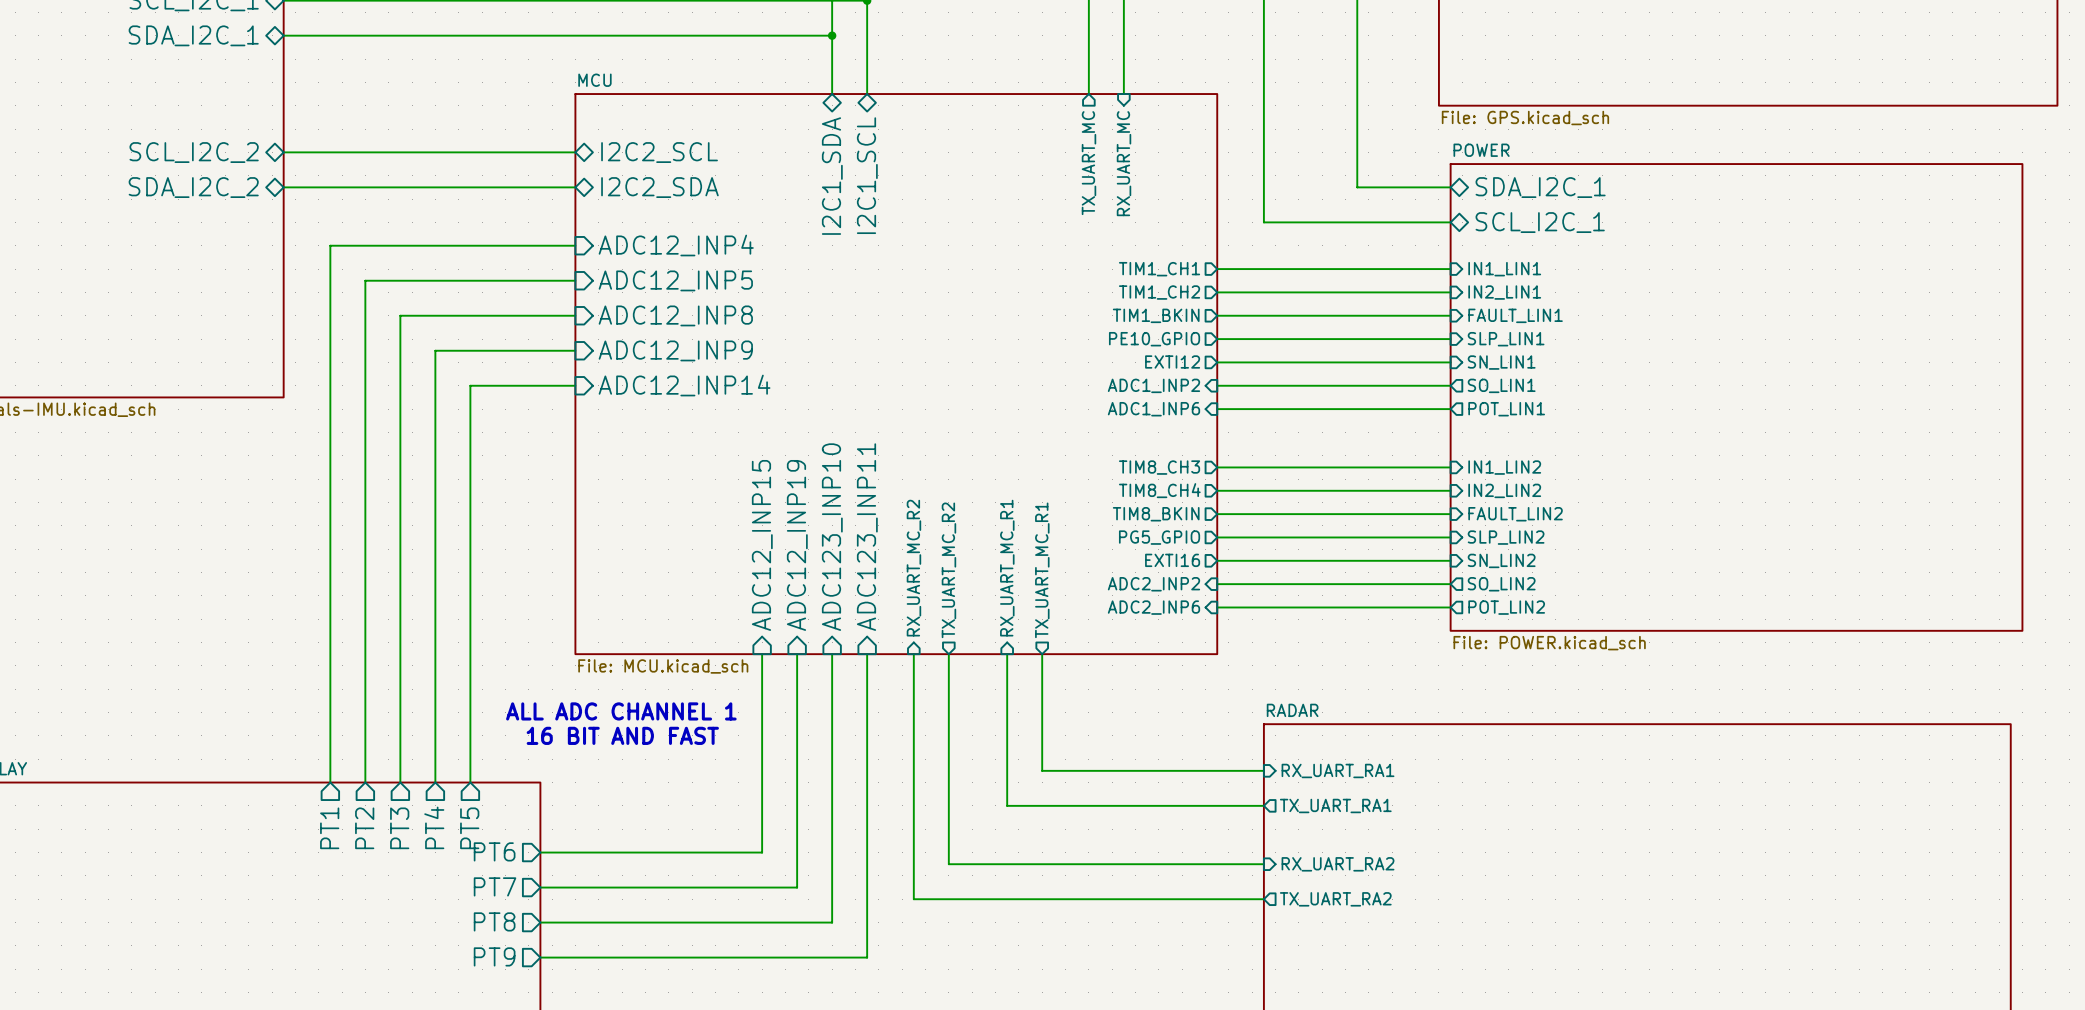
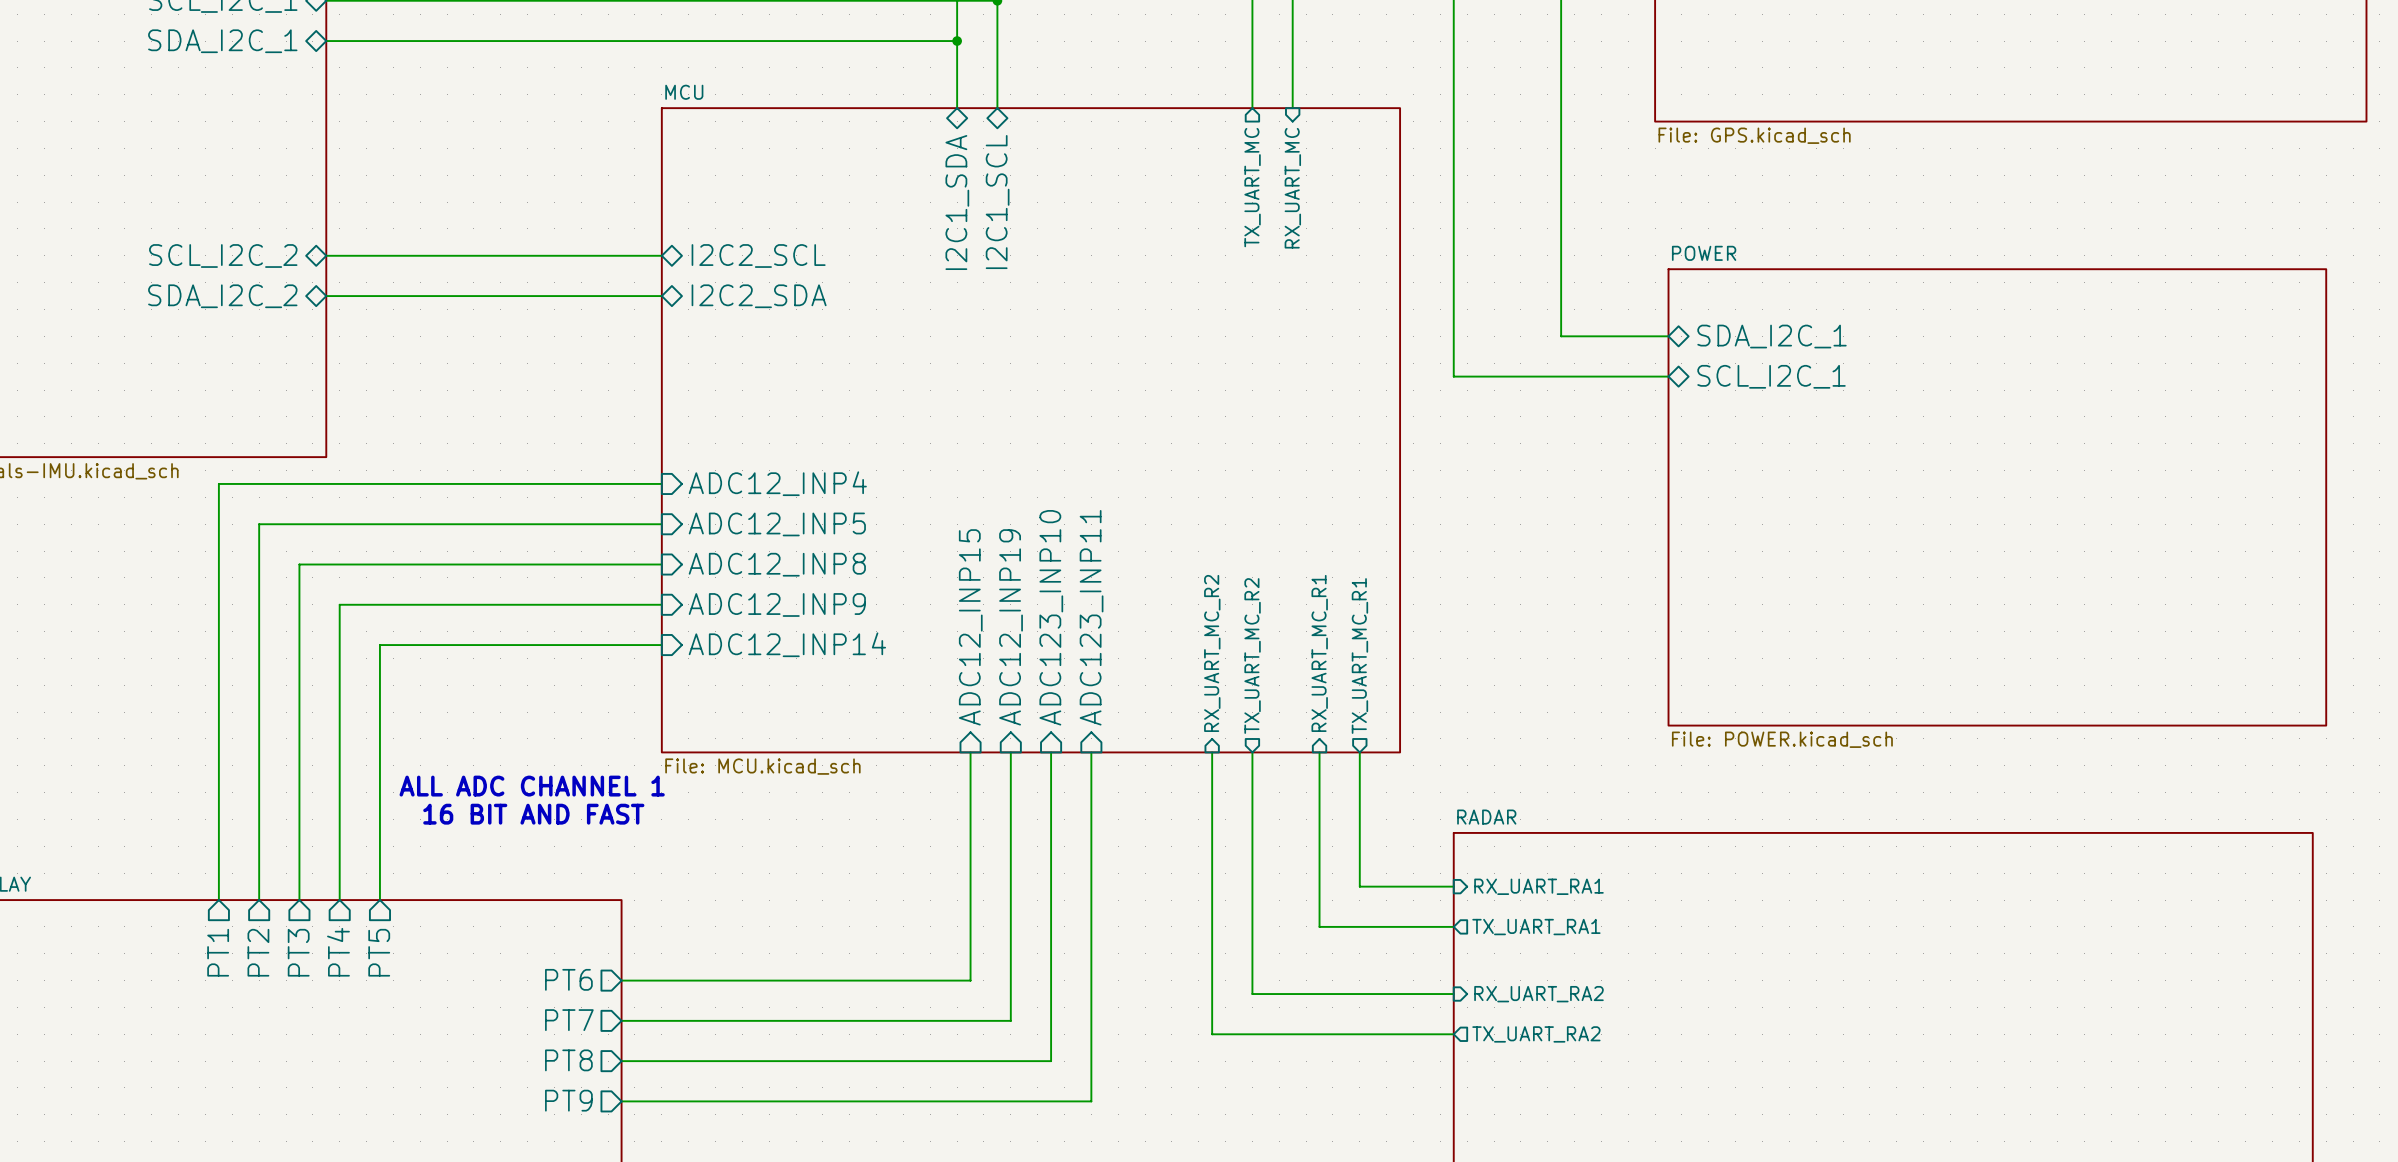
sheet pin position: SCL_I2C_2 (194, 152) -> SCL_I2C_2 (223, 256)
wire: (283, 152) (575, 152) -> (326, 255) (661, 255)
sheet pin position: I2C2_SCL (659, 152) -> I2C2_SCL (758, 256)
sheet pin position: SDA_I2C_2 (193, 187) -> SDA_I2C_2 (222, 296)
wire: (283, 187) (575, 187) -> (326, 296) (661, 296)
sheet pin position: I2C2_SDA (659, 187) -> I2C2_SDA (759, 296)
wire: (1357, 187) (1450, 187) -> (1561, 215) (1561, 336)
sheet pin position: SDA_I2C_1 (1540, 187) -> SDA_I2C_1 (1772, 336)
wire: (1263, 222) (1450, 222) -> (1453, 255) (1453, 376) (1668, 376)
sheet pin position: SCL_I2C_1 (1540, 222) -> SCL_I2C_1 (1771, 376)
wire: (575, 245) (330, 245) (330, 560) -> (661, 645) (379, 645)
sheet pin position: ADC12_INP4 (676, 245) -> ADC12_INP4 (777, 483)
sheet pin: TIM1_CH1 (1159, 269) -> none
wire: (1217, 269) (1450, 269) -> none
sheet pin: IN1_LIN1 (1504, 269) -> none
wire: (575, 280) (365, 280) (365, 782) -> none
sheet pin position: ADC12_INP5 (675, 280) -> ADC12_INP5 (777, 524)
sheet pin: TIM1_CH2 (1159, 292) -> none
wire: (1217, 292) (1357, 292) -> none
sheet pin: IN2_LIN1 (1504, 292) -> none
wire: (575, 315) (400, 315) (400, 782) -> none
sheet pin position: ADC12_INP8 (675, 315) -> ADC12_INP8 (777, 564)
sheet pin: TIM1_BKIN (1156, 315) -> none
wire: (1217, 315) (1450, 315) -> none
sheet pin: FAULT_LIN1 (1515, 315) -> none
sheet pin: PE10_GPIO (1154, 339) -> none
wire: (1217, 339) (1450, 339) -> none
sheet pin: SLP_LIN1 (1506, 339) -> none
wire: (575, 350) (435, 350) (435, 782) -> none
sheet pin position: ADC12_INP9 (675, 350) -> ADC12_INP9 (777, 604)
sheet pin: EXTI12 (1172, 361) -> none
wire: (1217, 362) (1450, 362) -> none
sheet pin: SN_LIN1 (1501, 362) -> none
wire: (575, 385) (470, 385) (470, 782) -> none
sheet pin position: ADC12_INP14 (684, 385) -> ADC12_INP14 (787, 644)
sheet pin: ADC1_INP2 (1153, 385) -> none
wire: (1217, 385) (1450, 385) -> none
sheet pin: SO_LIN1 (1501, 385) -> none
sheet POWER: File: POWER.kicad_sch (1736, 397) -> none
sheet pin: ADC1_INP6 (1153, 409) -> none
wire: (1217, 409) (1450, 409) -> none
sheet pin: POT_LIN1 (1506, 409) -> none
wire: none -> (661, 483) (218, 483) (218, 900)
sheet POWER: none -> File: POWER.kicad_sch (1997, 497)
wire: none -> (661, 524) (259, 524) (259, 900)
sheet pin: TIM8_CH3 (1159, 467) -> none
wire: (1217, 467) (1450, 467) -> none
sheet pin: IN1_LIN2 (1504, 467) -> none
wire: none -> (661, 564) (299, 564) (299, 900)
sheet pin: TIM8_CH4 (1159, 490) -> none
wire: (1217, 490) (1450, 490) -> none
sheet pin: IN2_LIN2 (1504, 490) -> none
sheet pin: TIM8_BKIN (1156, 514) -> none
wire: (1217, 514) (1450, 514) -> none
sheet pin: FAULT_LIN2 (1515, 514) -> none
wire: none -> (661, 604) (339, 604) (339, 900)
sheet pin position: ADC123_INP10 (832, 537) -> ADC123_INP10 (1051, 617)
sheet pin position: ADC123_INP11 (867, 537) -> ADC123_INP11 (1091, 617)
sheet pin: PG5_GPIO (1159, 537) -> none
wire: (1217, 537) (1450, 537) -> none
sheet pin: SLP_LIN2 (1506, 537) -> none
sheet pin position: ADC12_INP15 (762, 545) -> ADC12_INP15 (970, 627)
sheet pin position: ADC12_INP19 (797, 545) -> ADC12_INP19 (1011, 627)
sheet pin: EXTI16 (1172, 560) -> none
wire: (1217, 560) (1450, 560) -> none
sheet pin: SN_LIN2 (1501, 560) -> none
sheet pin position: RX_UART_MC_R2 (913, 568) -> RX_UART_MC_R2 (1212, 653)
sheet pin position: RX_UART_MC_R1 (1007, 568) -> RX_UART_MC_R1 (1319, 653)
sheet pin position: TX_UART_MC_R2 (948, 570) -> TX_UART_MC_R2 (1252, 656)
sheet pin position: TX_UART_MC_R1 (1042, 570) -> TX_UART_MC_R1 (1359, 656)
sheet pin: ADC2_INP2 (1153, 584) -> none
wire: (1217, 584) (1450, 584) -> none
sheet pin: SO_LIN2 (1501, 584) -> none
sheet pin: ADC2_INP6 (1153, 607) -> none
wire: (1217, 607) (1450, 607) -> none
sheet pin: POT_LIN2 (1506, 607) -> none
wire: (762, 654) (762, 852) -> (970, 752) (970, 980) (876, 980)
wire: (797, 654) (797, 887) -> (1010, 752) (1010, 1020) (916, 1020)
wire: (832, 654) (832, 922) -> none
wire: (867, 654) (867, 957) -> (1091, 994) (1091, 1101) (997, 1101)
wire: (1007, 654) (1007, 805) (1147, 805) -> (1319, 752) (1319, 926)
wire: (1042, 654) (1042, 770) (1182, 770) -> (1359, 752) (1359, 886)
wire: none -> (1212, 752) (1212, 1034)
text position: ALL ADC CHANNEL 1 (621, 711) -> ALL ADC CHANNEL 1 (532, 786)
text position: 16 BIT AND FAST (622, 735) -> 16 BIT AND FAST (533, 814)
sheet pin position: PT4 (434, 827) -> PT4 (338, 952)
sheet pin: none -> PT1 (218, 952)
sheet pin: PT1 (329, 828) -> PT5 (379, 952)
sheet pin position: PT2 (364, 828) -> PT2 (258, 952)
sheet pin position: PT3 (399, 828) -> PT3 (298, 952)
sheet pin: PT5 (469, 828) -> none
wire: (948, 864) (1088, 864) -> (1252, 752) (1252, 994)
wire: (913, 899) (1053, 899) -> (1051, 1034) (1051, 1061) (957, 1061)

